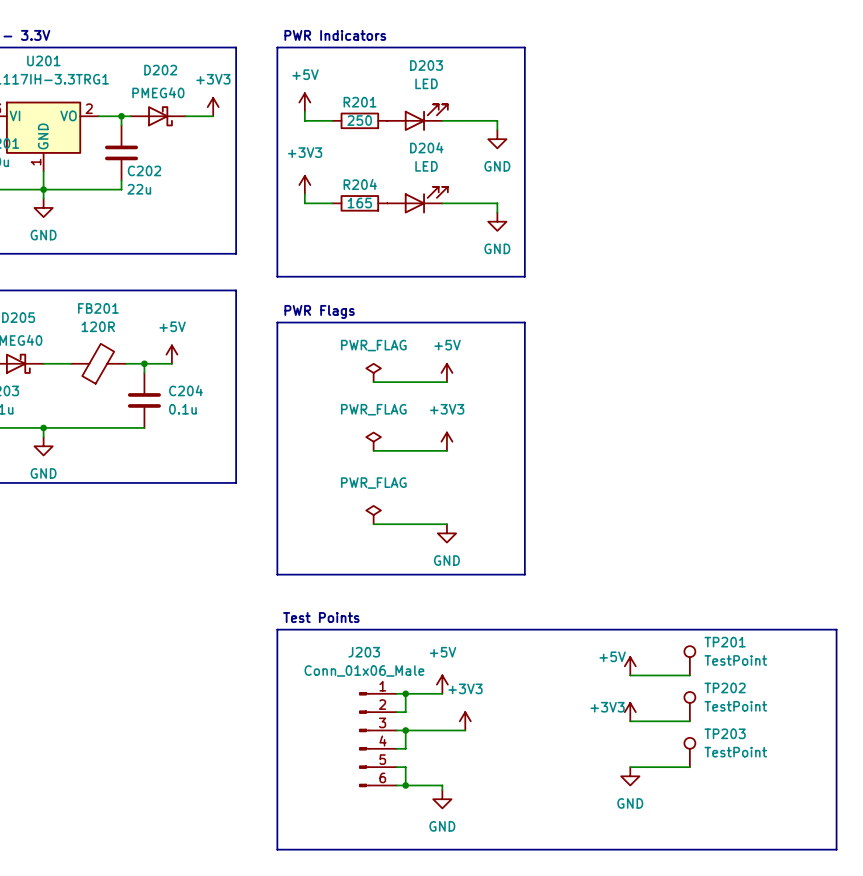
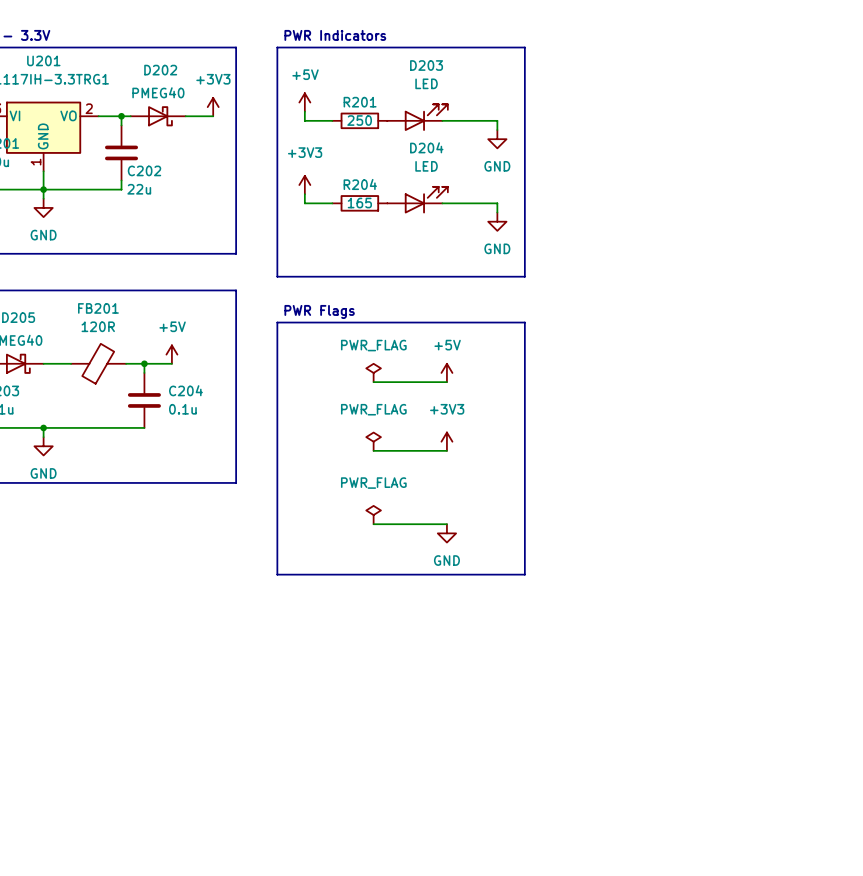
text: Test Points (321, 617) -> none
line: (277, 629) (277, 849) (836, 849) (836, 629) (277, 629) -> none
TP201: TestPoint (689, 660) -> none
power symbol: +5V (630, 666) -> none
wire: (630, 675) (689, 675) -> none
power symbol: +5V (442, 684) -> none
wire: (396, 693) (442, 693) -> none
wire: (405, 693) (405, 712) (396, 712) -> none
junction: (405, 693) -> none
TP202: TestPoint (689, 706) -> none
power symbol: +3V3 (630, 712) -> none
power symbol: +3V3 (465, 721) -> none
wire: (630, 721) (689, 721) -> none
wire: (396, 730) (465, 730) -> none
wire: (405, 730) (405, 748) (396, 748) -> none
junction: (405, 730) -> none
J203: Conn_01x06_Male (377, 739) -> none
TP203: TestPoint (689, 752) -> none
wire: (396, 767) (405, 767) (405, 785) -> none
wire: (630, 767) (689, 767) -> none
power symbol: GND (630, 776) -> none
wire: (396, 785) (442, 785) (442, 790) -> none
junction: (405, 785) -> none
power symbol: GND (442, 799) -> none

